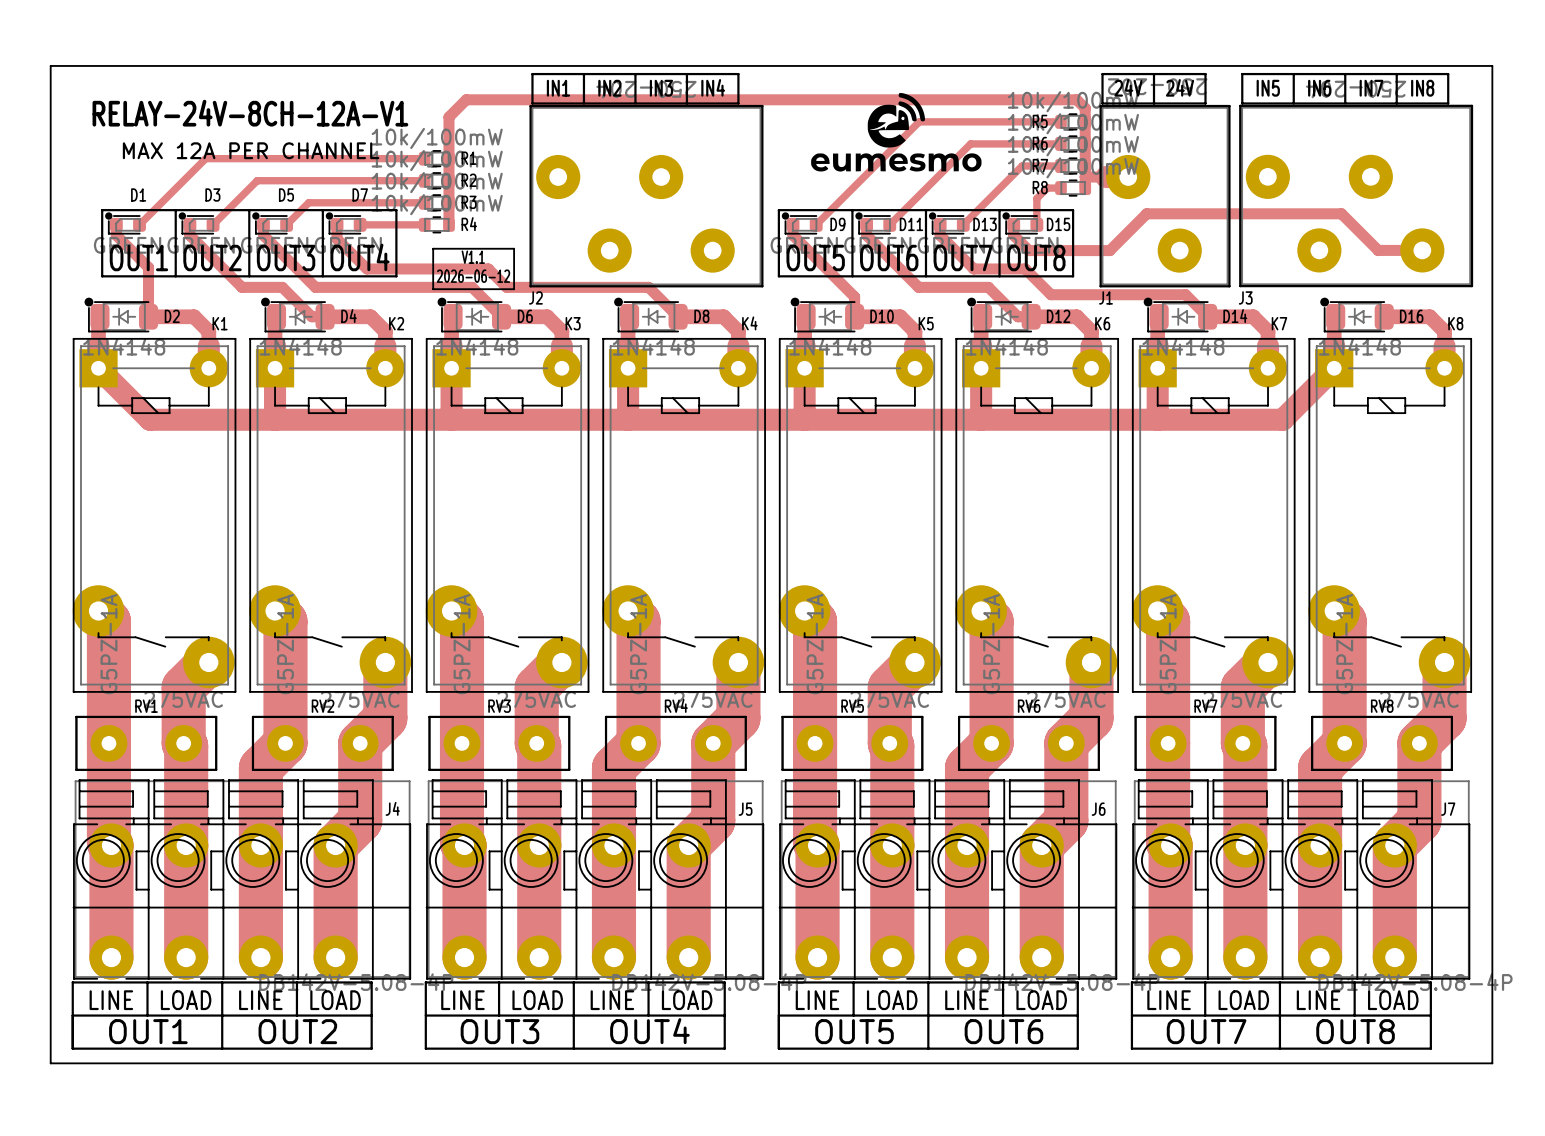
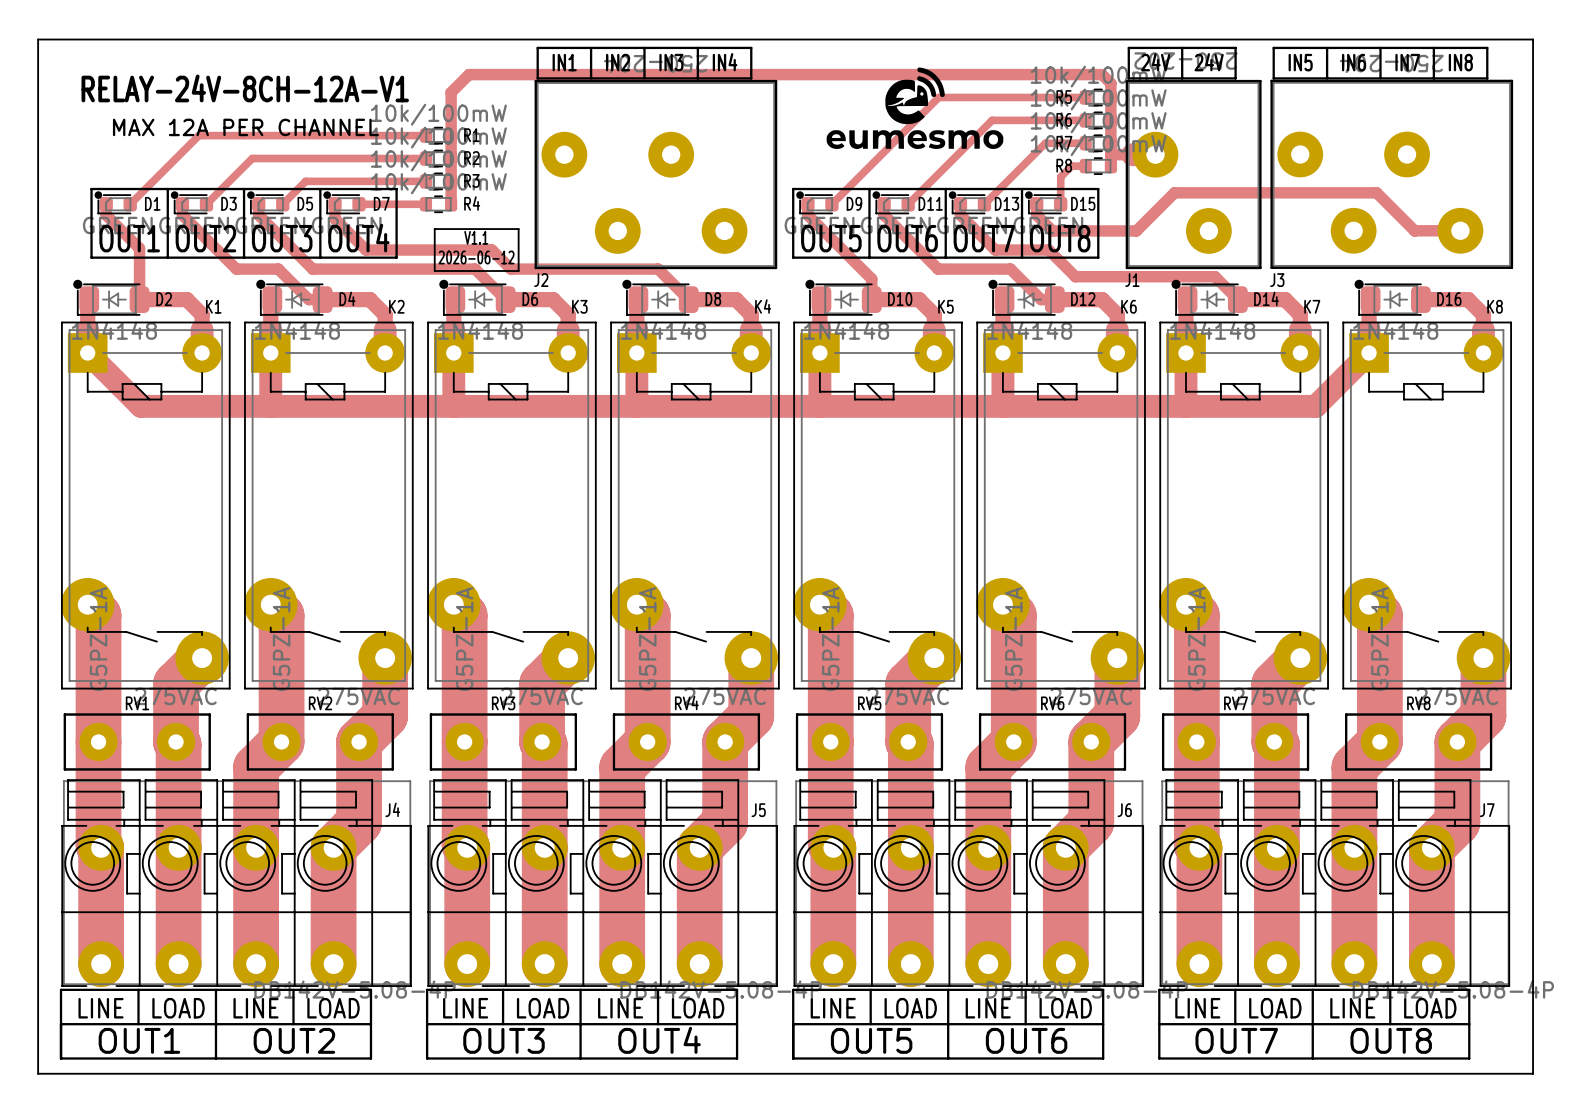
D1 name position: D1 (138, 194) -> D1 (152, 203)
D3 name position: D3 (212, 194) -> D3 (229, 203)
D5 name position: D5 (286, 194) -> D5 (305, 203)
D7 name position: D7 (360, 194) -> D7 (381, 203)

